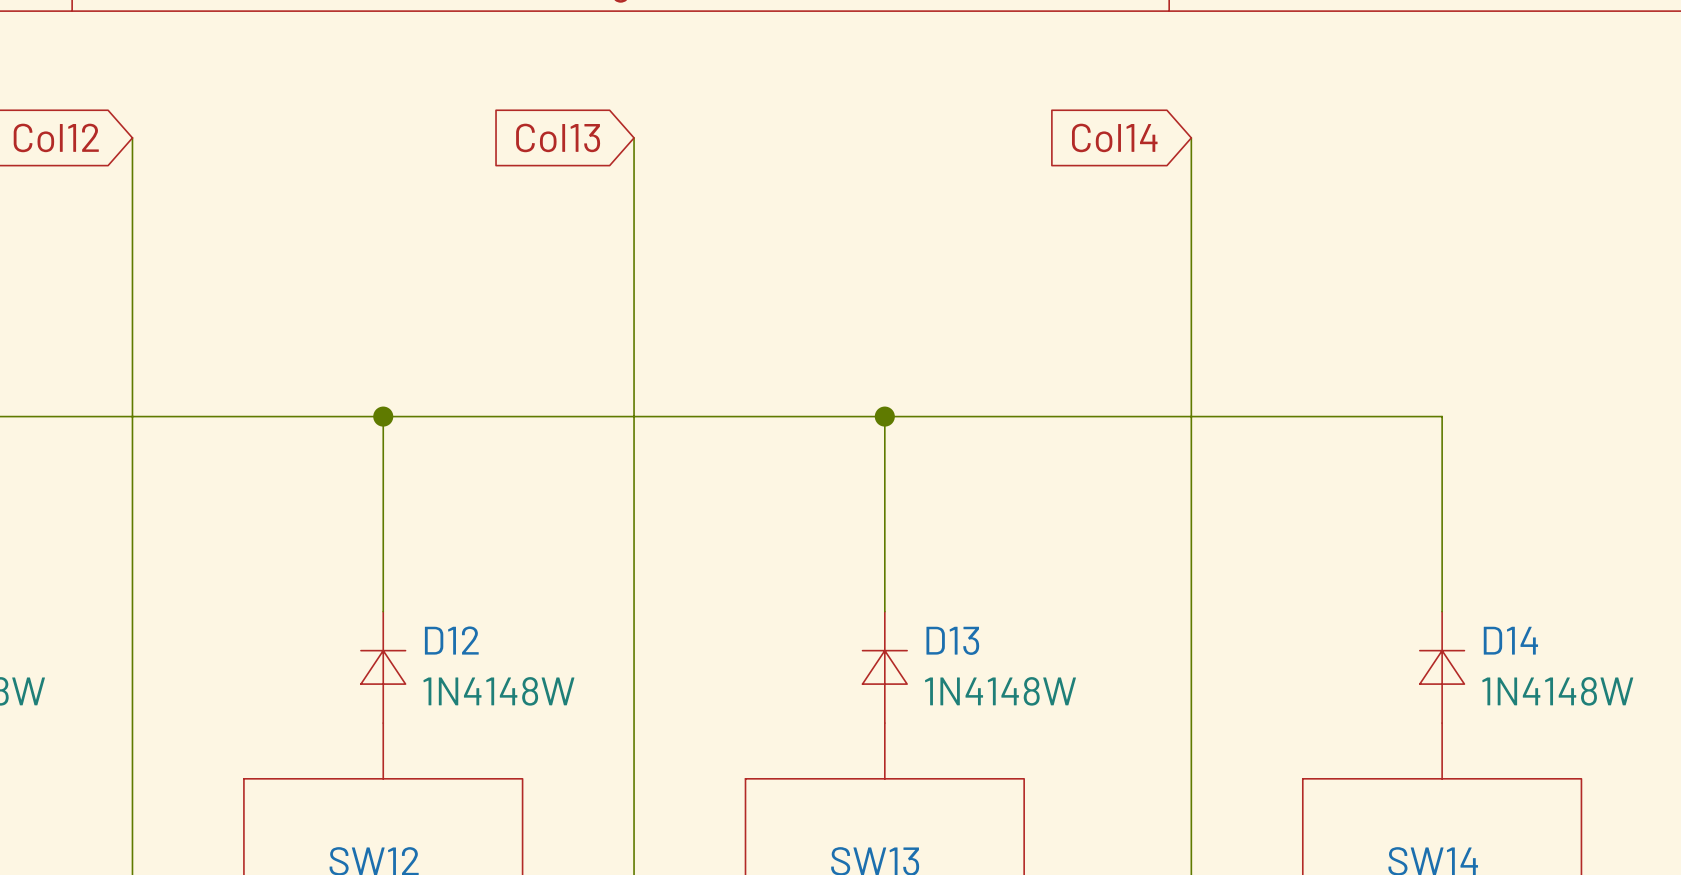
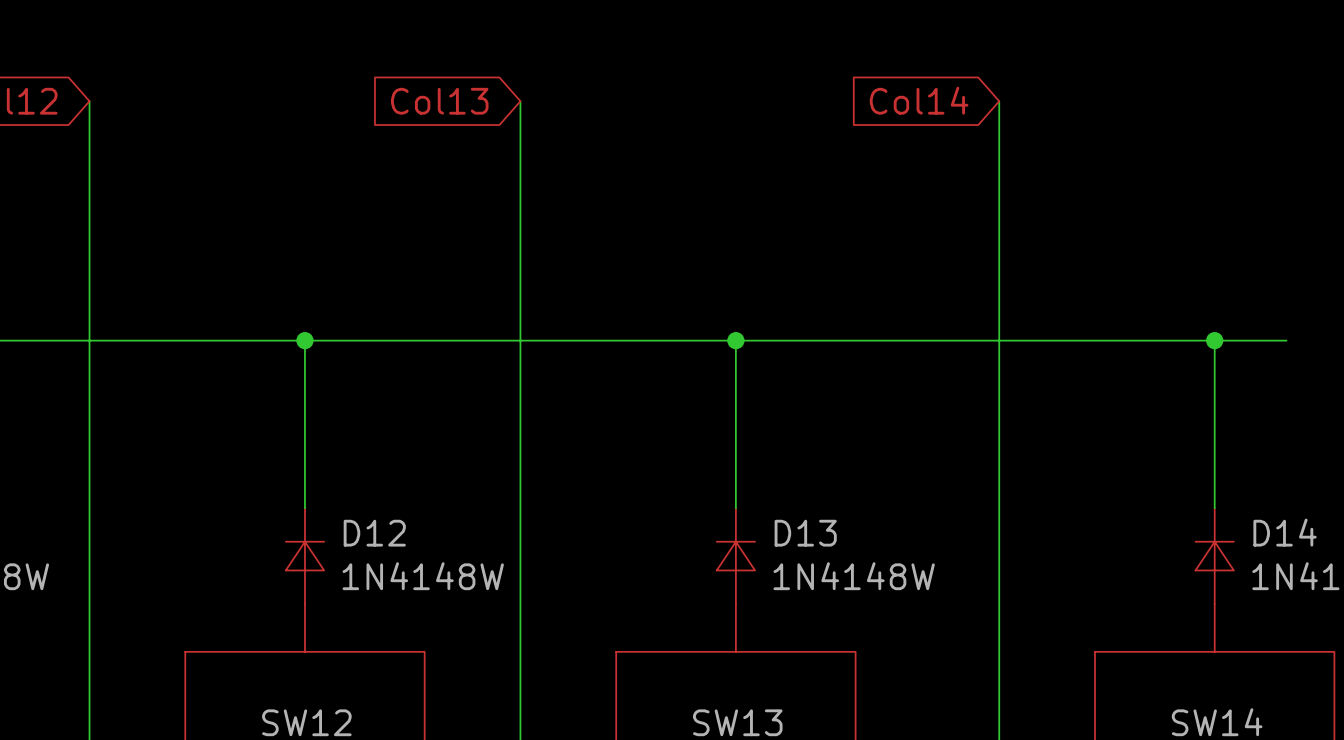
wire: none -> (1214, 340) (1286, 340)
junction: none -> (1214, 340)

